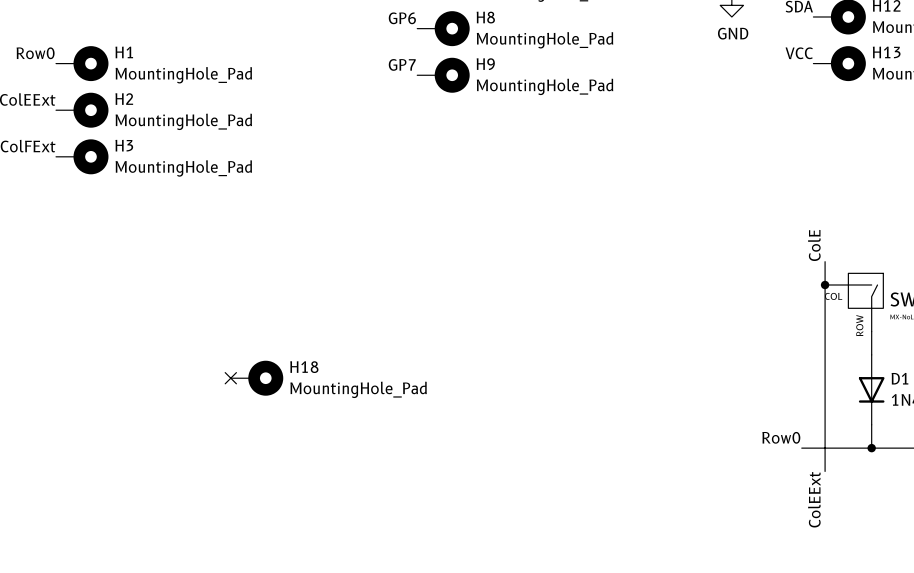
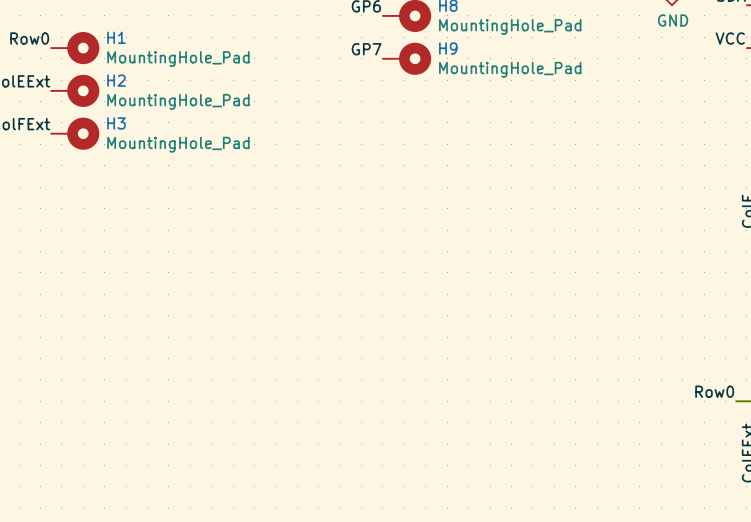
no-connect mark: (230, 378) -> none
H18: MountingHole_Pad (257, 378) -> none

